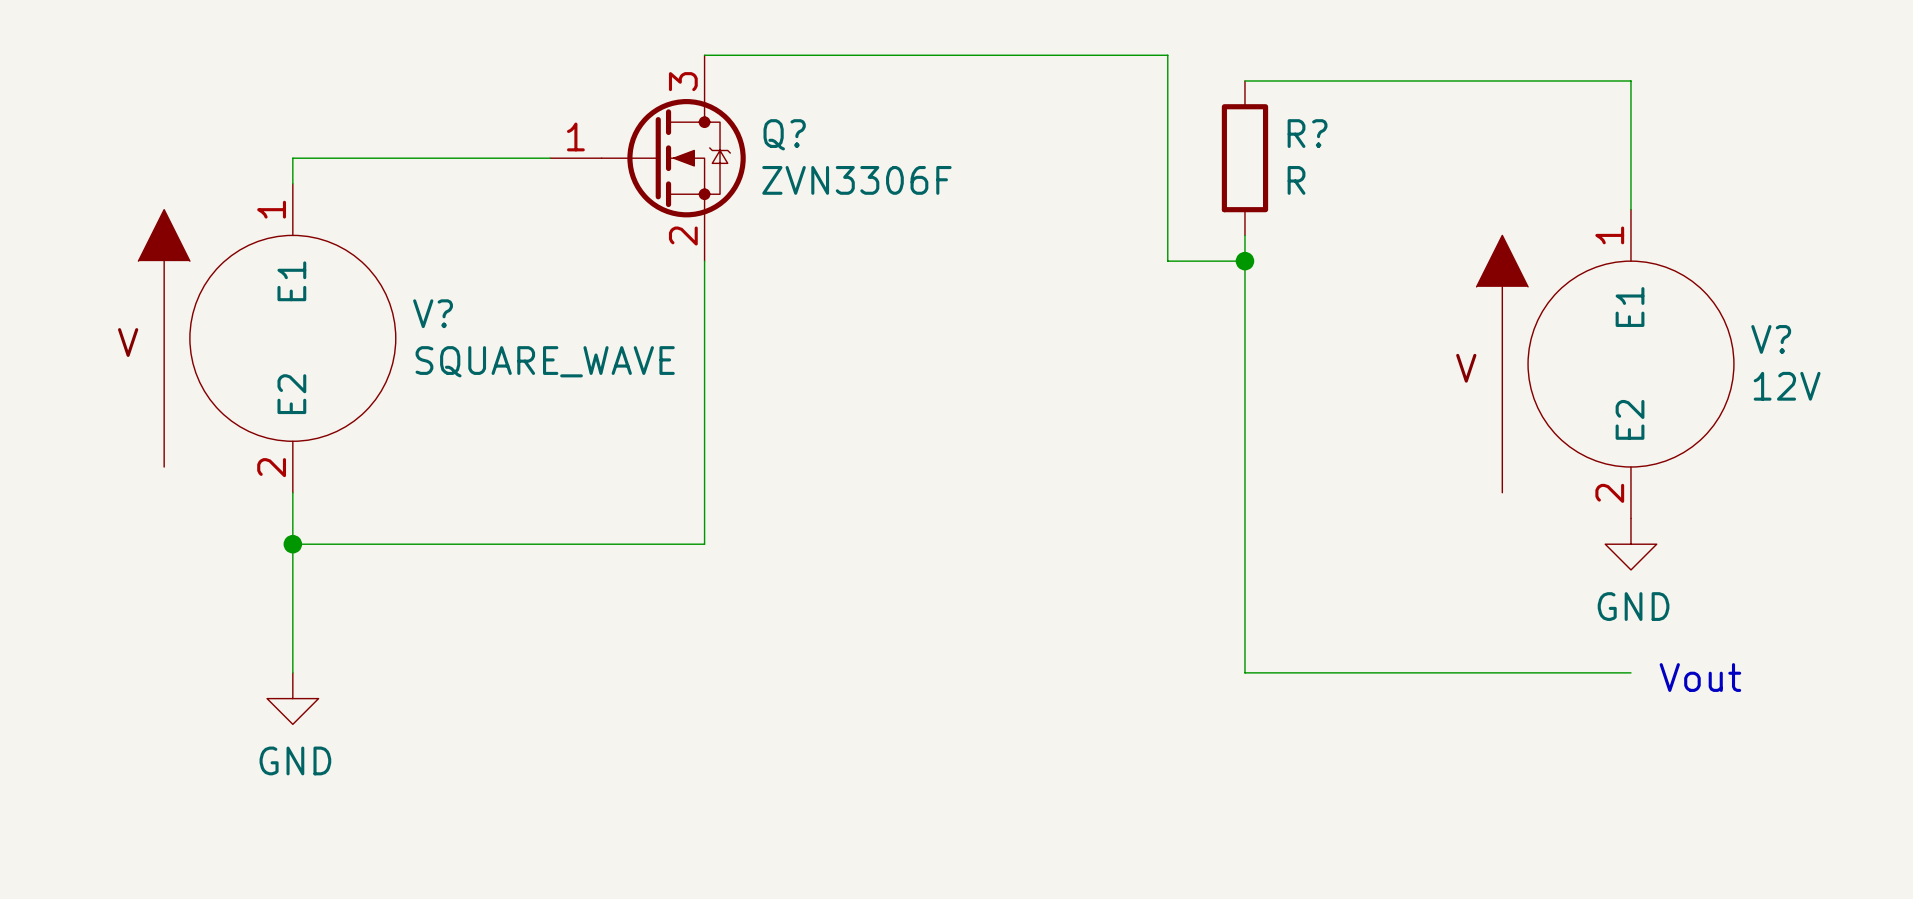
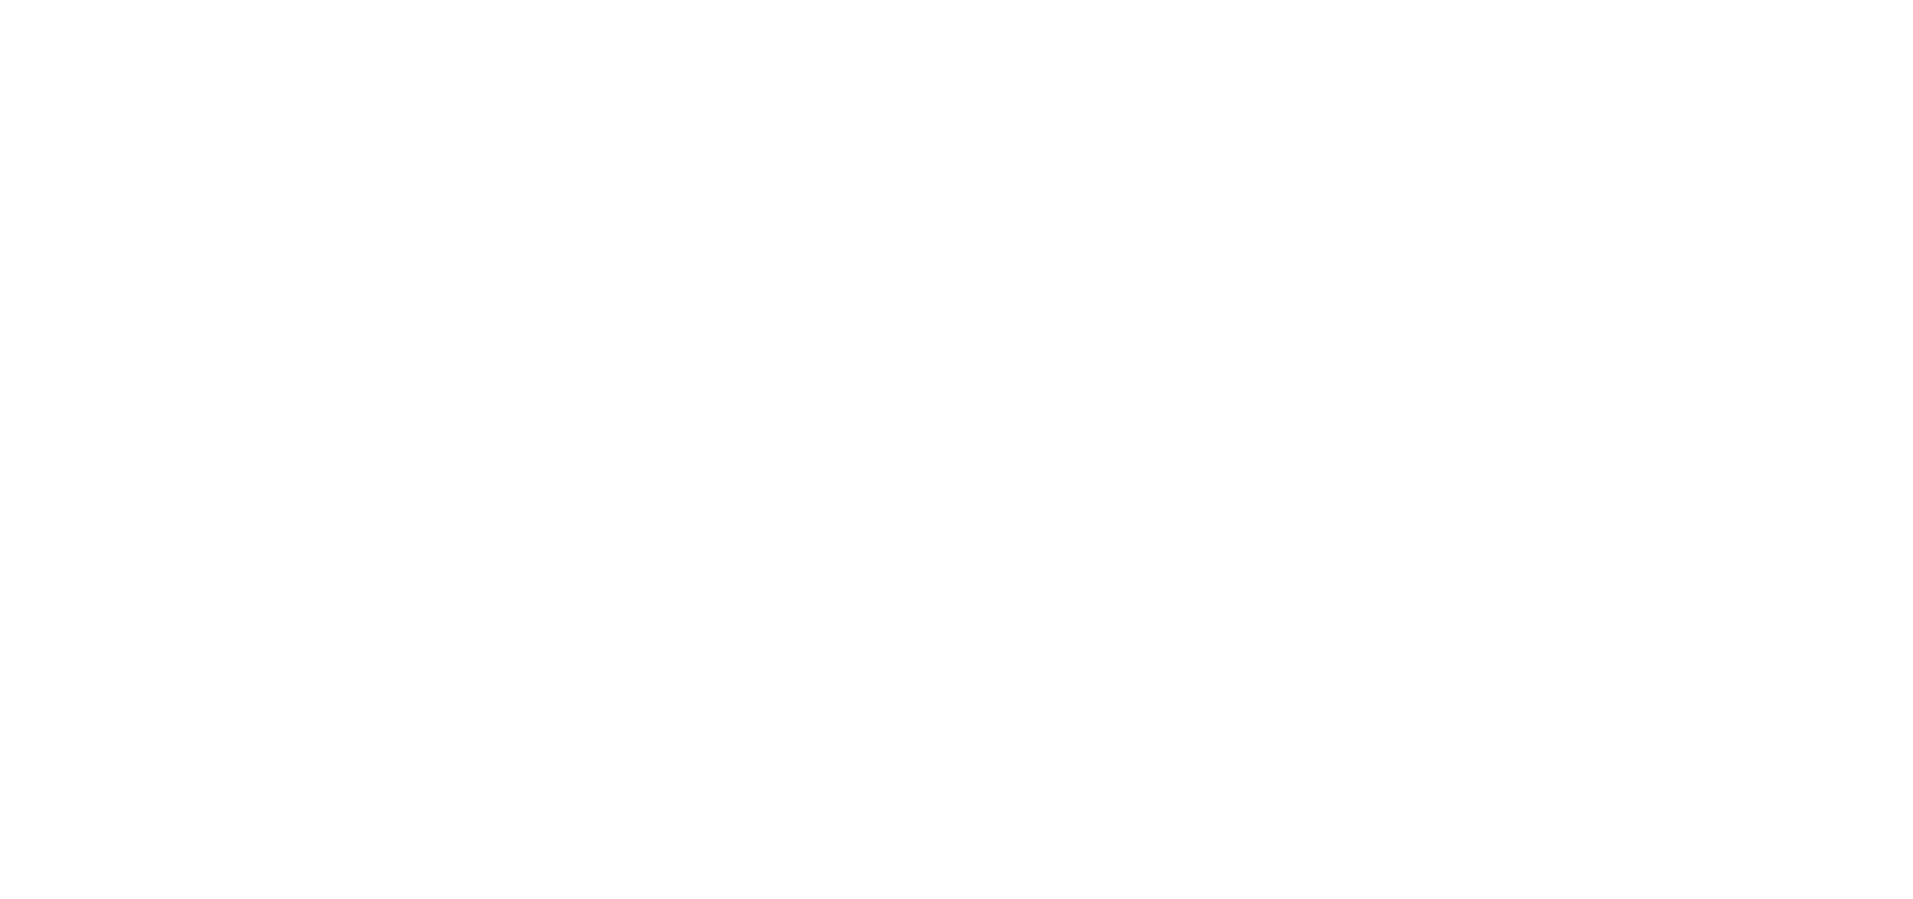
wire: (704, 55) (1167, 55) (1167, 261) (1244, 261) -> none
wire: (1244, 81) (1630, 81) (1630, 209) -> none
wire: (550, 158) (292, 158) (292, 183) -> none
Q?: ZVN3306F (647, 158) -> none
R?: R (1244, 158) -> none
wire: (1244, 235) (1244, 672) (1630, 672) -> none
wire: (704, 261) (704, 544) (292, 544) -> none
junction: (1244, 261) -> none
V?: SQUARE_WAVE (267, 338) -> none
V?: 12V (1605, 364) -> none
wire: (292, 492) (292, 672) -> none
junction: (292, 544) -> none
power symbol: GND (1630, 544) -> none
text: Vout (1700, 677) -> none
power symbol: GND (292, 698) -> none

